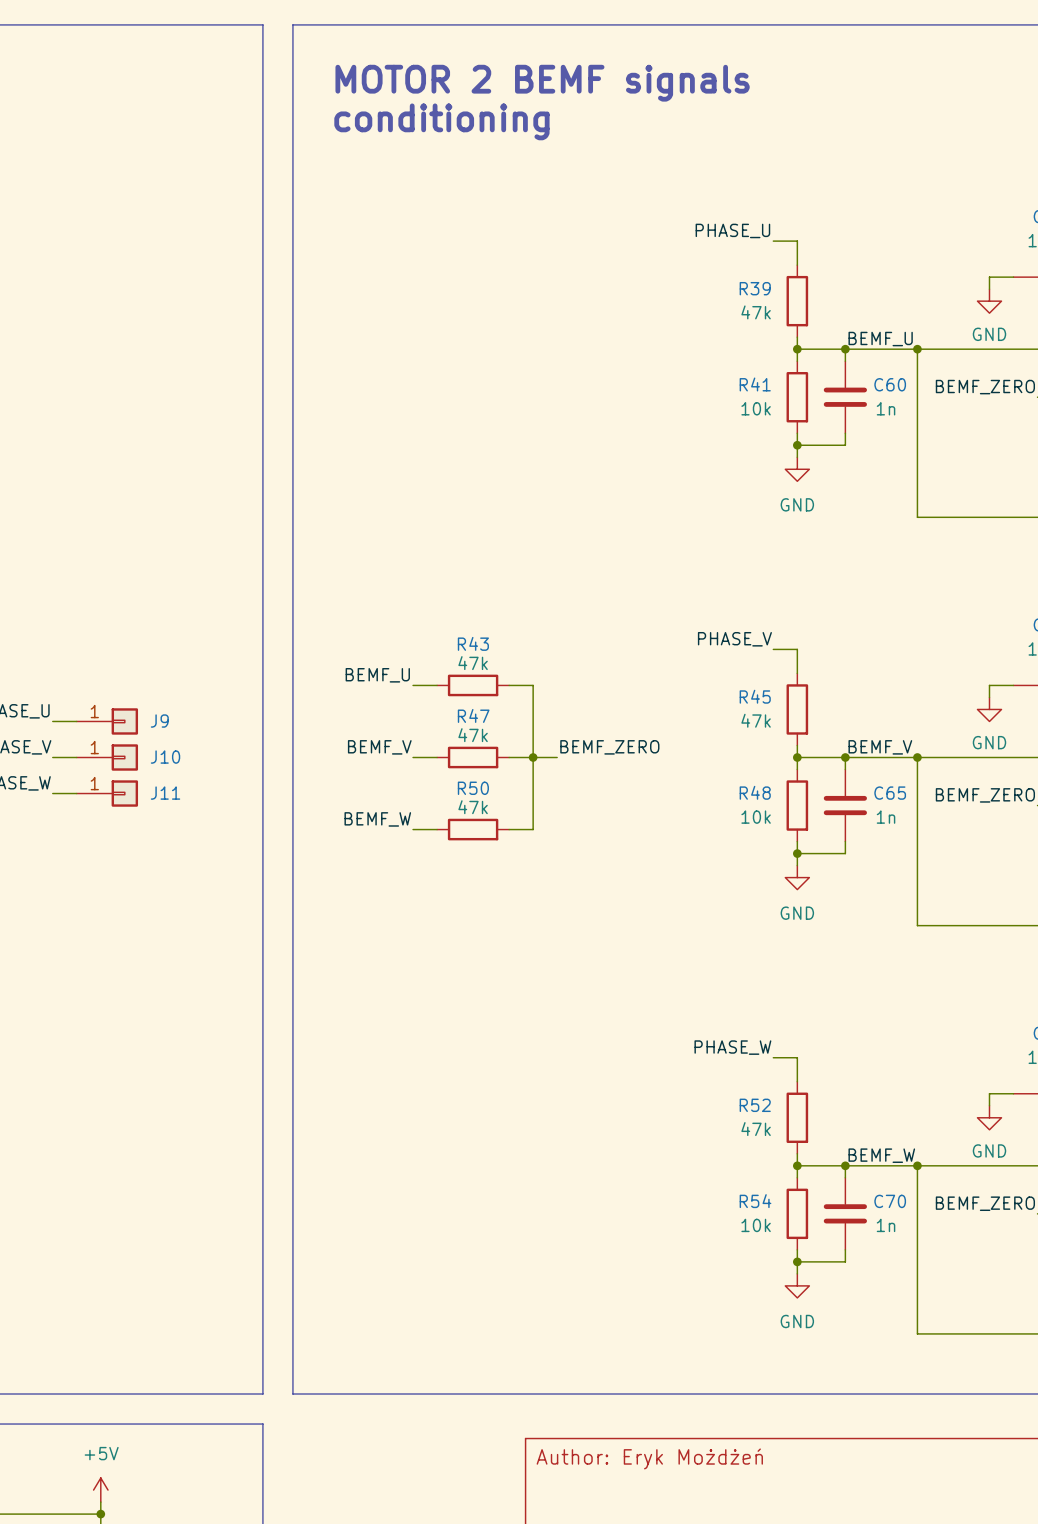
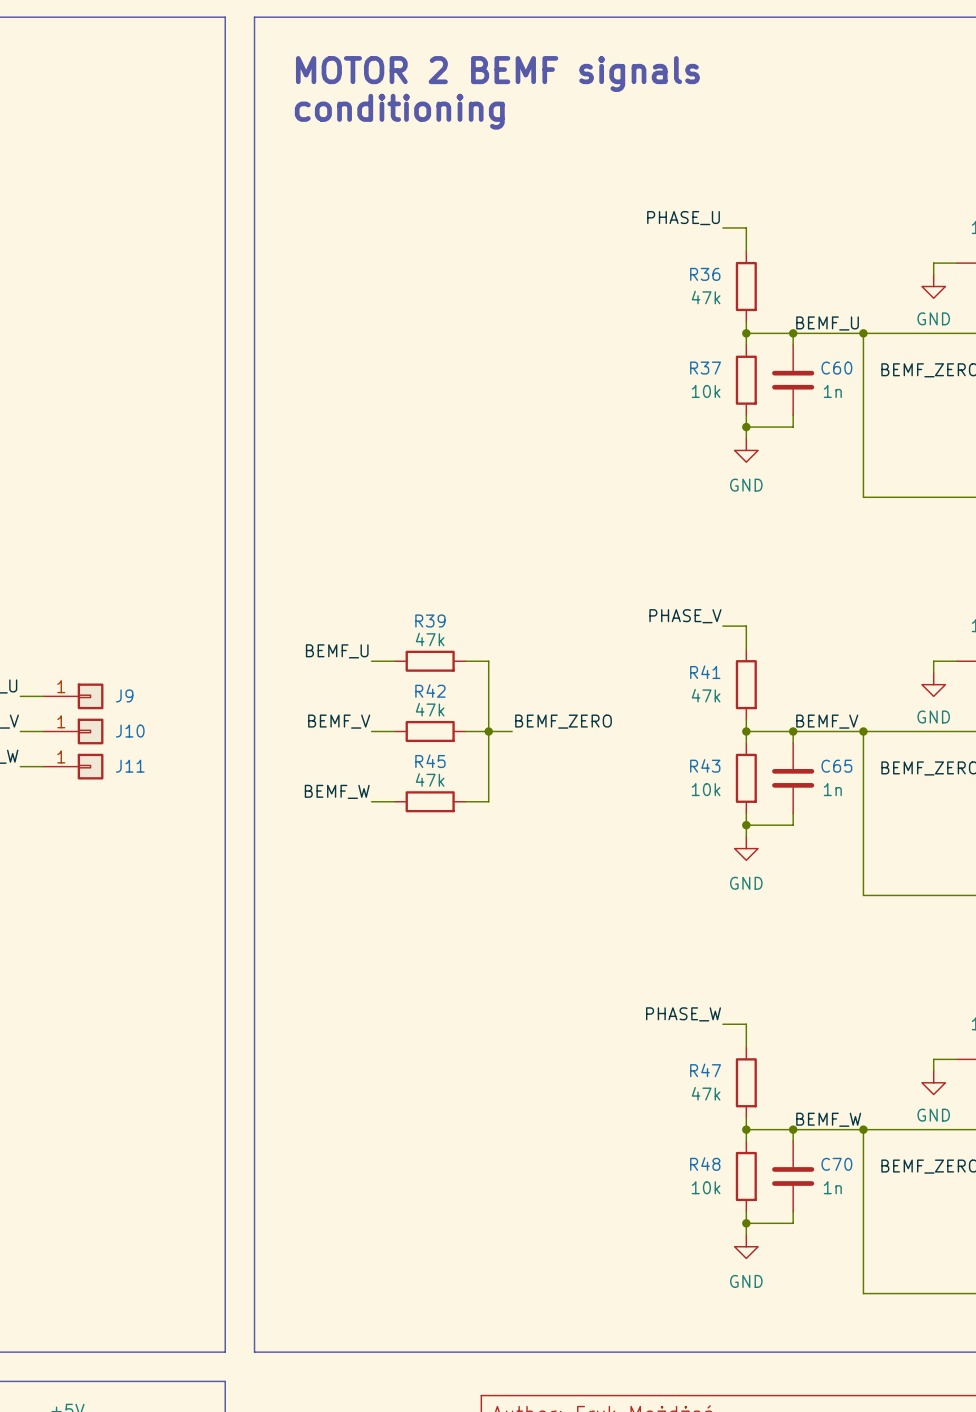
R39 name: R39 (755, 288) -> R36 (705, 274)
R41 name: R41 (755, 384) -> R37 (705, 368)
R43 name: R43 (473, 643) -> R39 (430, 620)
R45 name: R45 (755, 696) -> R41 (705, 672)
R47 name: R47 (473, 715) -> R42 (430, 690)
R50 name: R50 (473, 788) -> R45 (430, 761)
R48 name: R48 (755, 792) -> R43 (705, 765)
R52 name: R52 (755, 1105) -> R47 (705, 1070)
R54 name: R54 (755, 1201) -> R48 (705, 1164)

